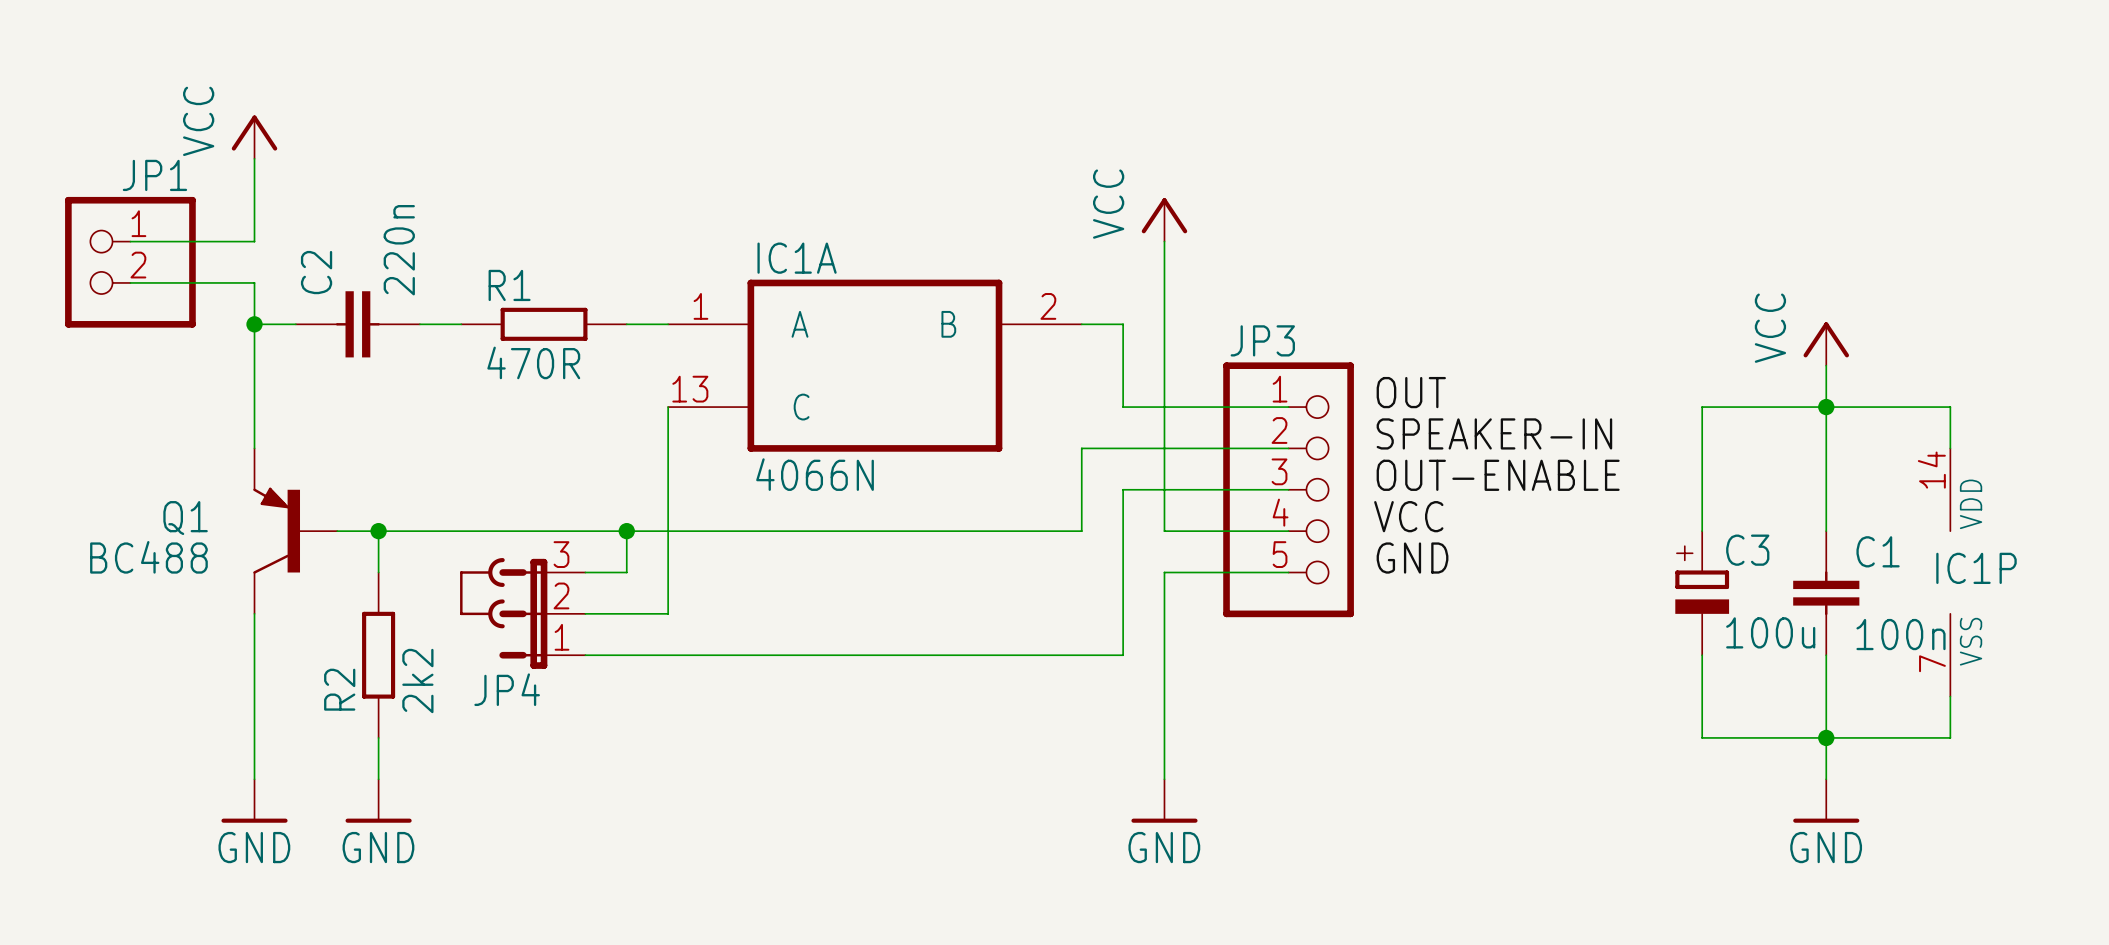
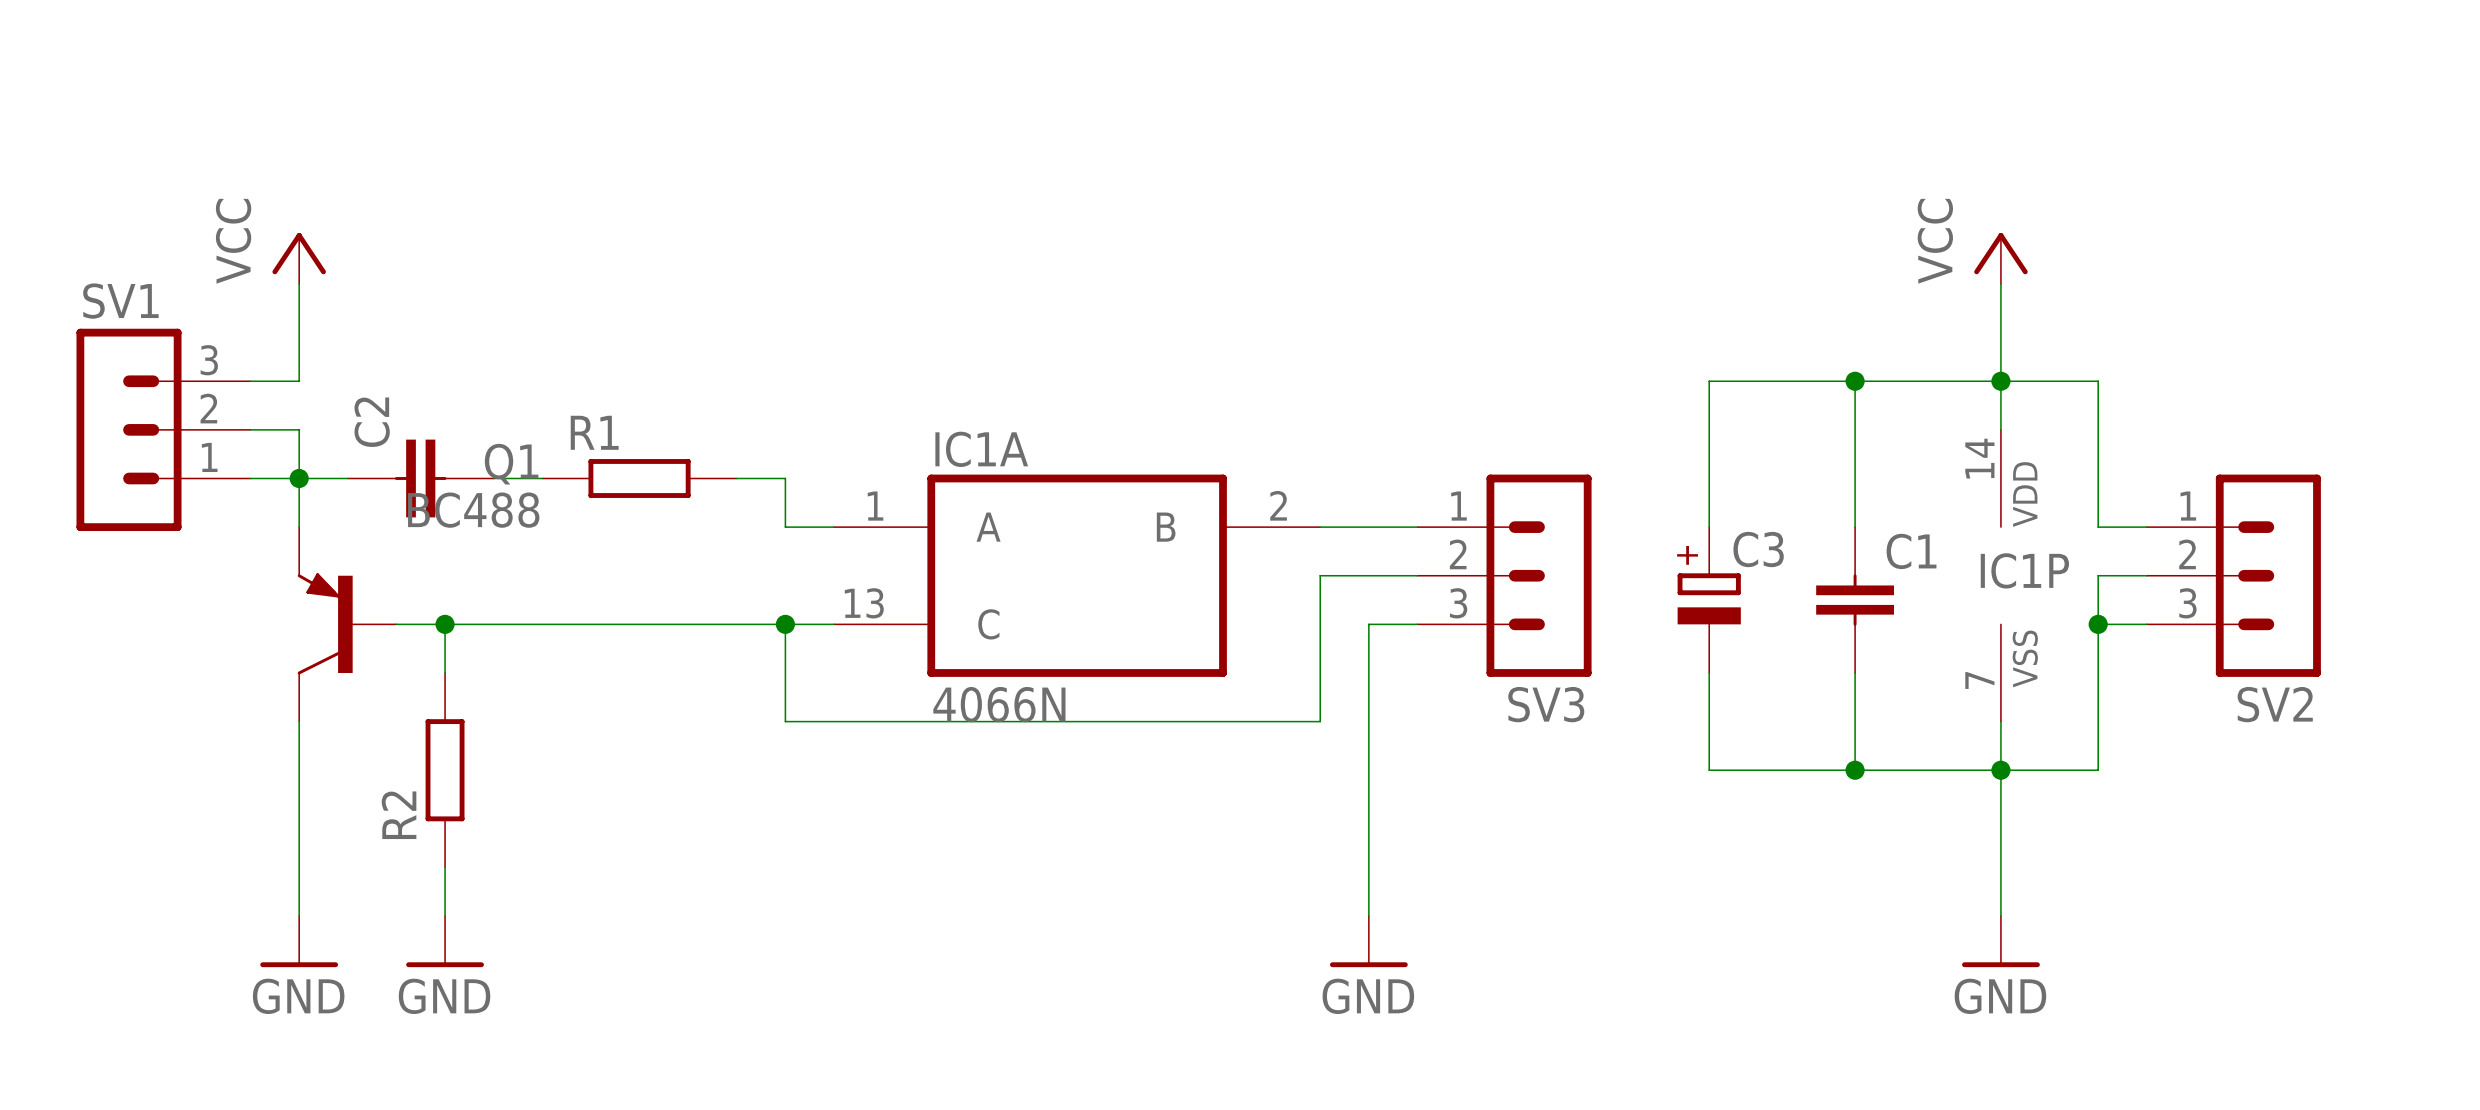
power symbol position: VCC (254, 137) -> VCC (299, 258)
wire: (254, 158) (254, 241) (130, 241) -> none
power symbol: VCC (1164, 219) -> none
wire: (1164, 241) (1164, 531) -> none
wire: none -> (2000, 284) (2000, 429)
C2 value: 220n (399, 250) -> none
JP1: (130, 262) -> none
wire: (130, 282) (254, 282) -> (299, 284) (299, 332)
wire: none -> (250, 381) (299, 381)
junction position: (254, 324) -> (299, 478)
wire: (295, 324) (254, 324) (254, 365) -> (250, 429) (299, 429)
C2 position: (357, 324) -> (420, 478)
wire: (419, 324) (461, 324) -> (493, 478) (542, 478)
R1 position: (544, 324) -> (639, 478)
wire: (626, 324) (668, 324) -> (736, 478) (785, 478)
wire: (1081, 324) (1123, 324) (1123, 407) (1288, 407) -> none
wire: none -> (1855, 381) (1855, 527)
junction: none -> (1855, 381)
junction: none -> (2000, 381)
power symbol position: VCC (1826, 343) -> VCC (2000, 258)
R1 value: 470R (533, 362) -> none
SV1: none -> (163, 429)
IC1A position: (874, 365) -> (1077, 575)
wire: (1826, 365) (1826, 531) -> (2098, 624) (2146, 624)
label: OUT (1411, 392) -> none
wire: none -> (250, 478) (347, 478)
junction: (1826, 407) -> none
label: SPEAKER-IN (1494, 433) -> none
wire: (668, 448) (668, 531) -> (785, 527) (834, 527)
wire: (1123, 448) (1081, 448) (1081, 531) (709, 531) -> none
wire: none -> (1709, 527) (1709, 381) (2098, 381) (2098, 527) (2146, 527)
wire: (1950, 448) (1950, 407) (1702, 407) (1702, 531) -> none
label: OUT-ENABLE (1498, 475) -> none
SV3: none -> (1504, 575)
JP3: (1288, 489) -> none
wire: none -> (2146, 575) (2098, 575) (2098, 770) (1709, 770) (1709, 672)
SV2: none -> (2233, 575)
label: VCC (1408, 516) -> none
Q1 name position: Q1 (185, 518) -> Q1 (511, 464)
wire: (626, 531) (626, 572) (585, 572) -> none
junction position: (626, 531) -> (785, 624)
junction: none -> (2098, 624)
Q1 value position: BC488 (148, 557) -> BC488 (473, 510)
label: GND (1412, 558) -> none
wire: (1164, 572) (1288, 572) -> (1368, 672) (1368, 624)
wire: none -> (1855, 672) (1855, 770)
IC1P position: (1950, 572) -> (2000, 575)
part: (482, 593) -> none
C3 position: (1702, 593) -> (1709, 600)
C1 position: (1826, 593) -> (1855, 600)
JP4: (542, 613) -> none
wire: (585, 613) (668, 613) -> none
wire: (1123, 613) (1123, 655) (585, 655) -> (1320, 721) (785, 721)
C3 value: 100u (1770, 632) -> none
C1 value: 100n (1901, 634) -> none
junction: none -> (1855, 770)
junction: none -> (2000, 770)
wire: (1826, 655) (1826, 779) -> none
R2 value: 2k2 (417, 681) -> none
wire: (1950, 696) (1950, 737) (1702, 737) -> (2000, 916) (2000, 867)
junction: (1826, 737) -> none
power symbol position: GND (1826, 801) -> GND (2000, 941)

